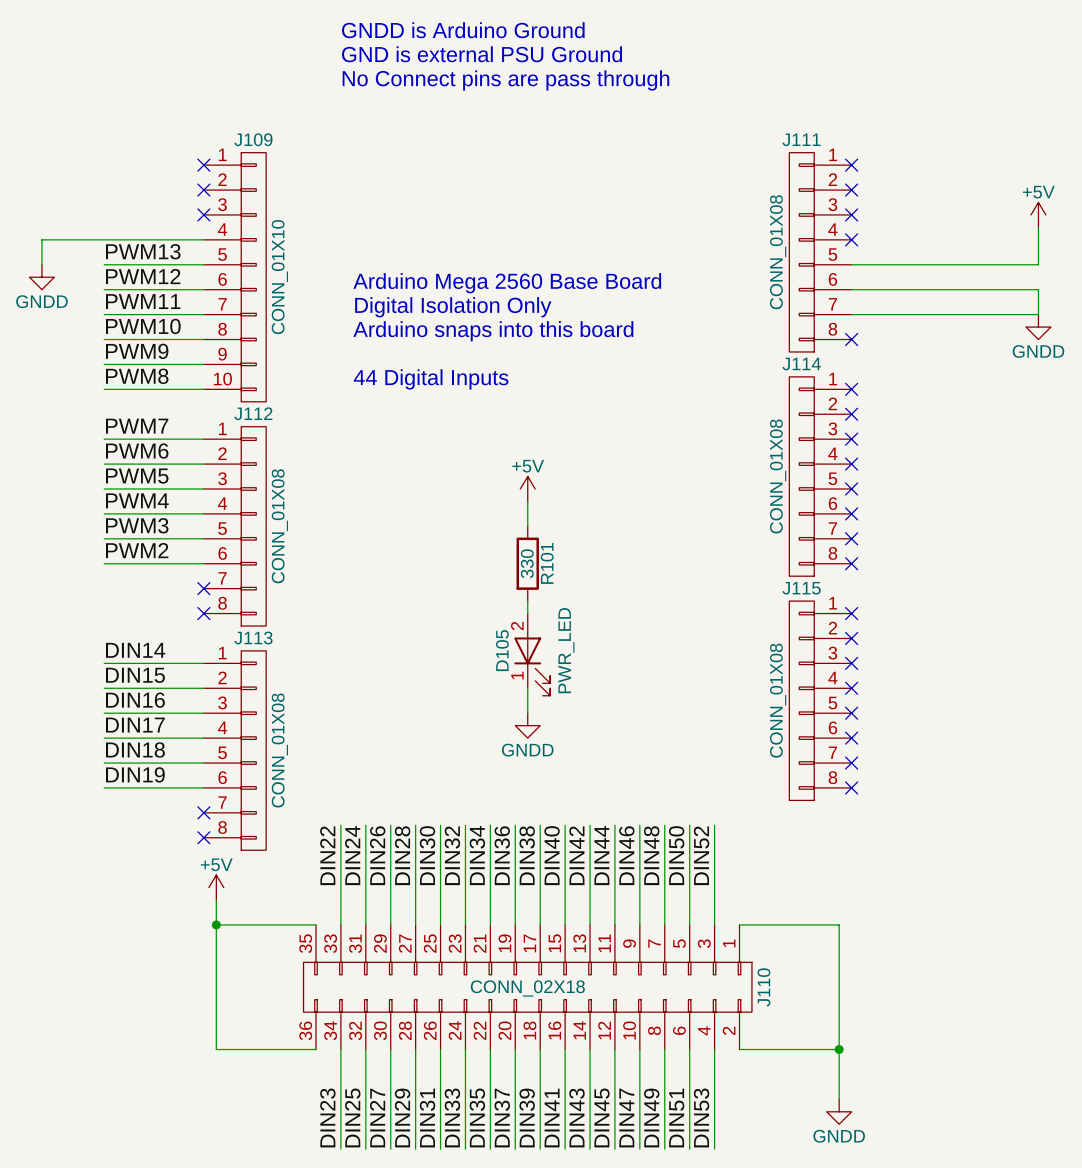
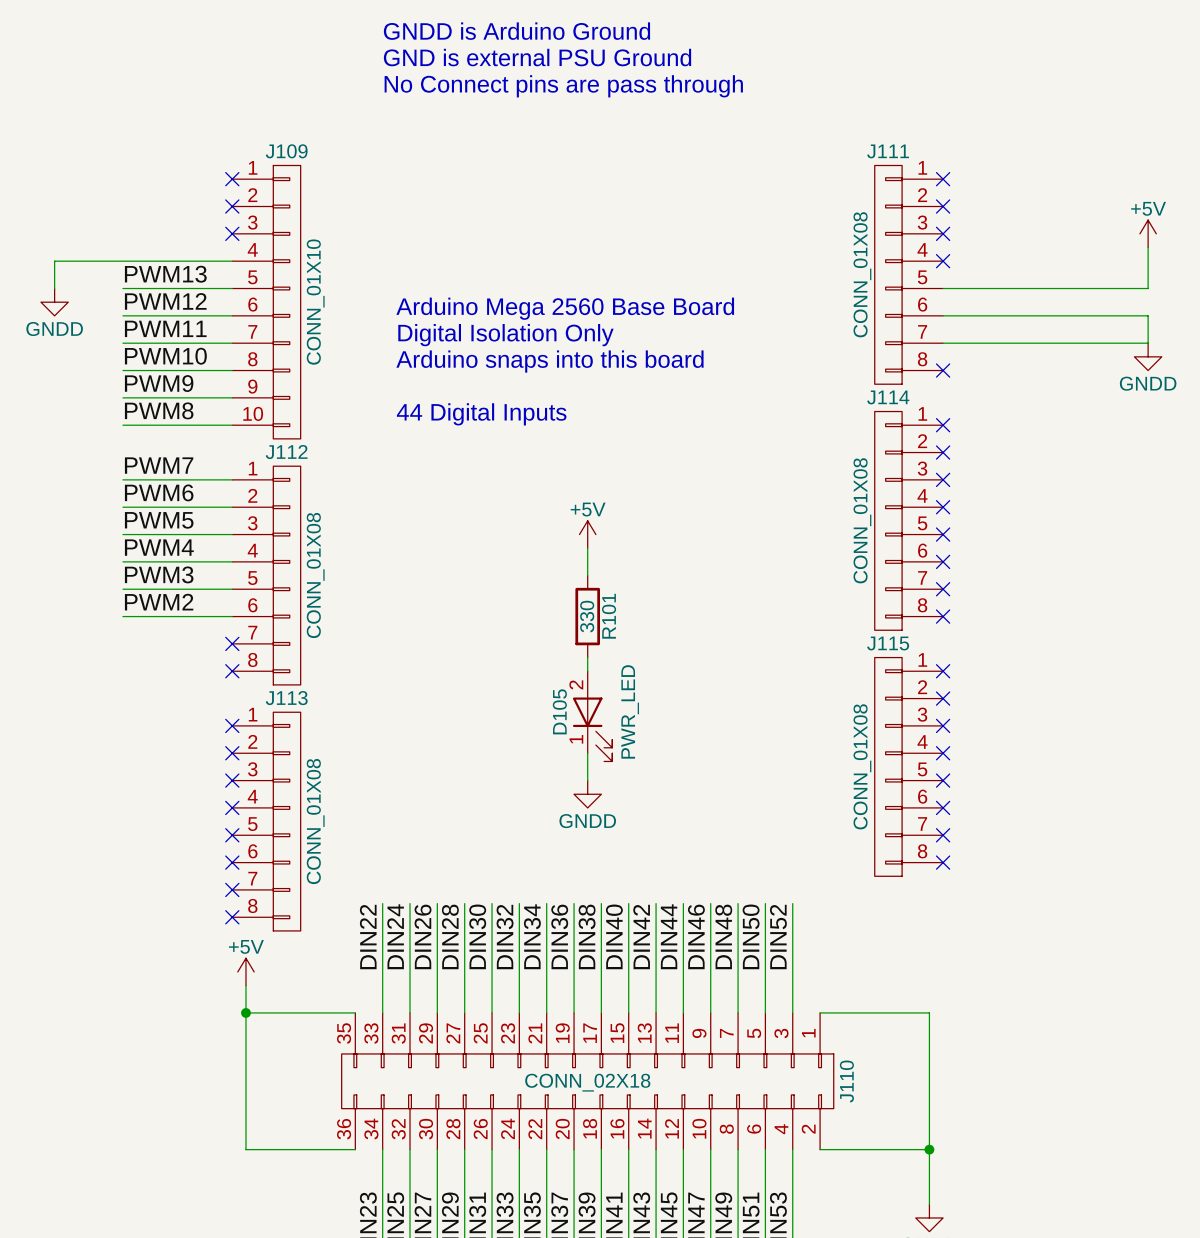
label: DIN14 (135, 650) -> none
wire: (104, 663) (203, 663) -> none
no-connect mark: none -> (232, 725)
label: DIN15 (135, 675) -> none
wire: (104, 688) (203, 688) -> none
no-connect mark: none -> (232, 753)
label: DIN16 (135, 700) -> none
wire: (104, 713) (203, 713) -> none
no-connect mark: none -> (232, 780)
label: DIN17 (135, 725) -> none
wire: (104, 738) (203, 738) -> none
no-connect mark: none -> (232, 807)
label: DIN18 (135, 749) -> none
wire: (104, 763) (203, 763) -> none
no-connect mark: none -> (232, 835)
label: DIN19 (135, 774) -> none
wire: (104, 787) (203, 787) -> none
no-connect mark: none -> (232, 862)

